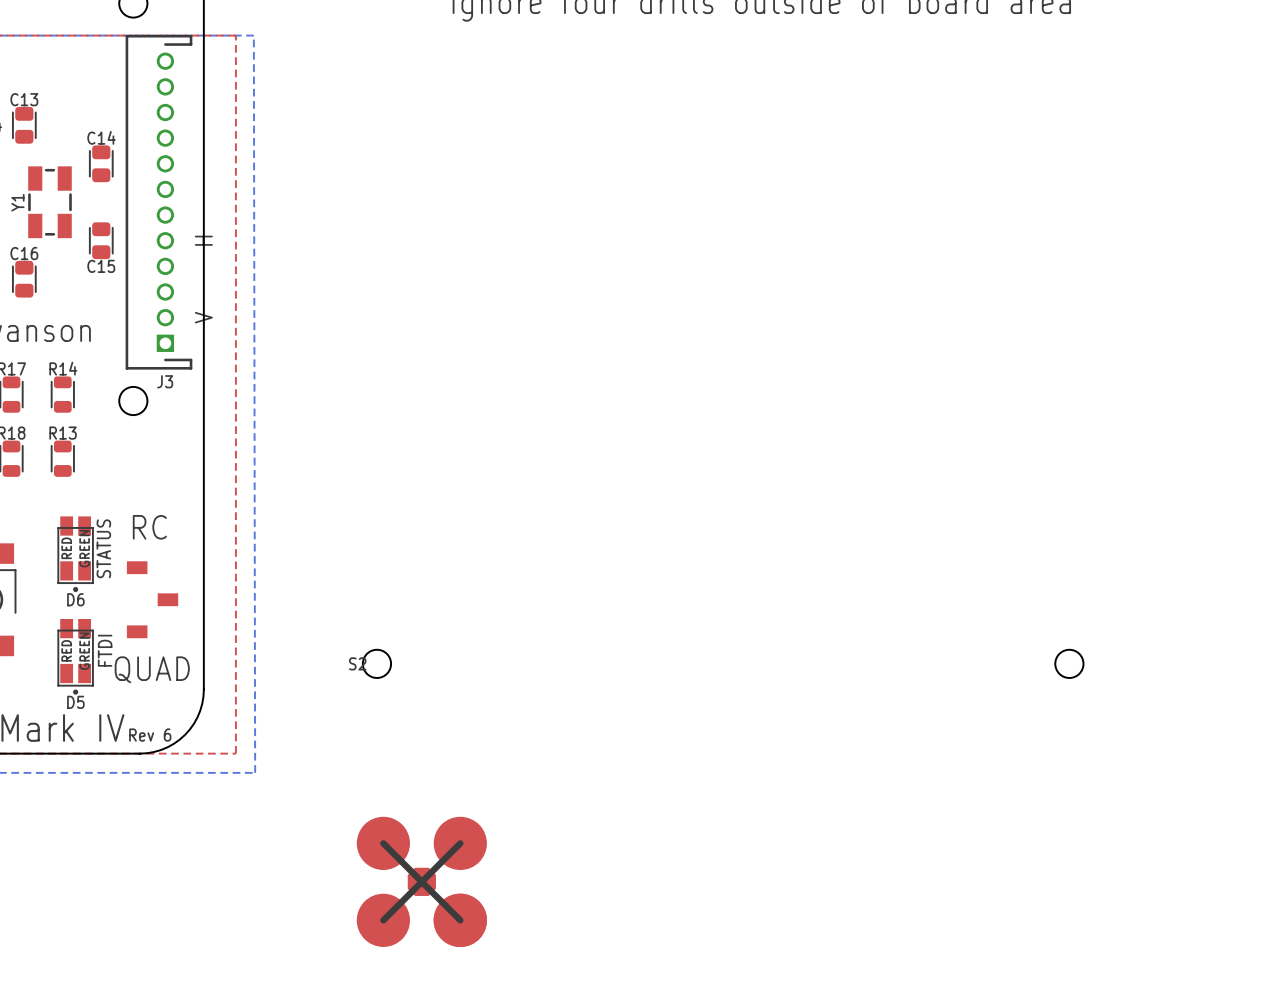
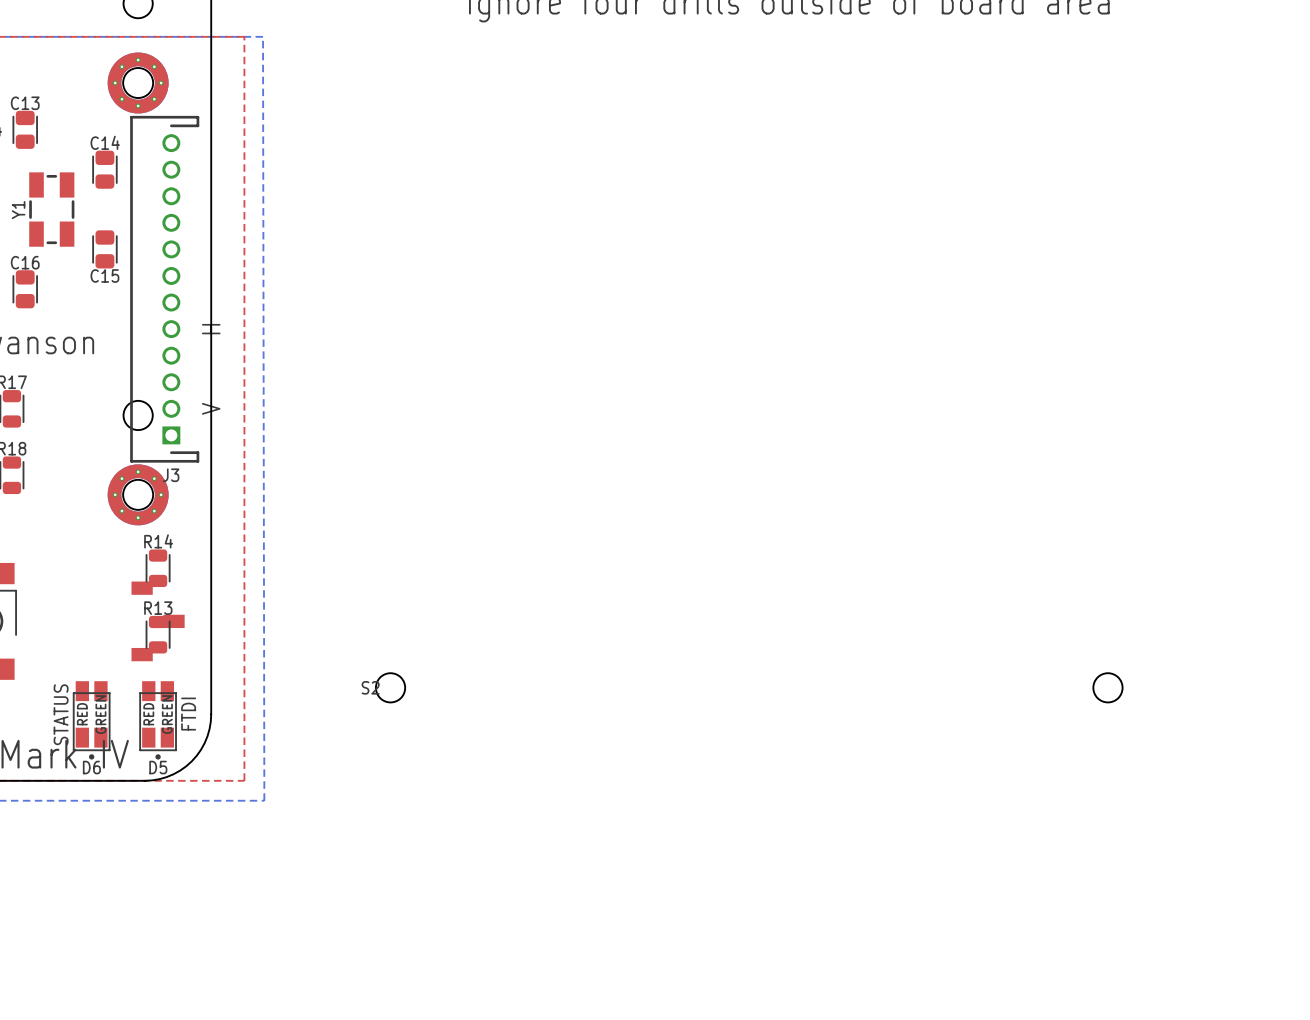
part: none -> (138, 83)
J3 position: (158, 202) -> (164, 289)
R14 position: (62, 394) -> (158, 568)
R13 position: (62, 458) -> (158, 634)
part: none -> (138, 494)
text: RC (149, 527) -> none
text position: STATUS (103, 548) -> STATUS (61, 714)
D6 position: (75, 554) -> (91, 720)
text position: FTDI (105, 650) -> FTDI (188, 714)
D5 position: (75, 656) -> (158, 720)
text: QUAD (152, 669) -> none
text: Rev 6 (150, 735) -> none
drawing: [356, 816, 488, 948] -> none

